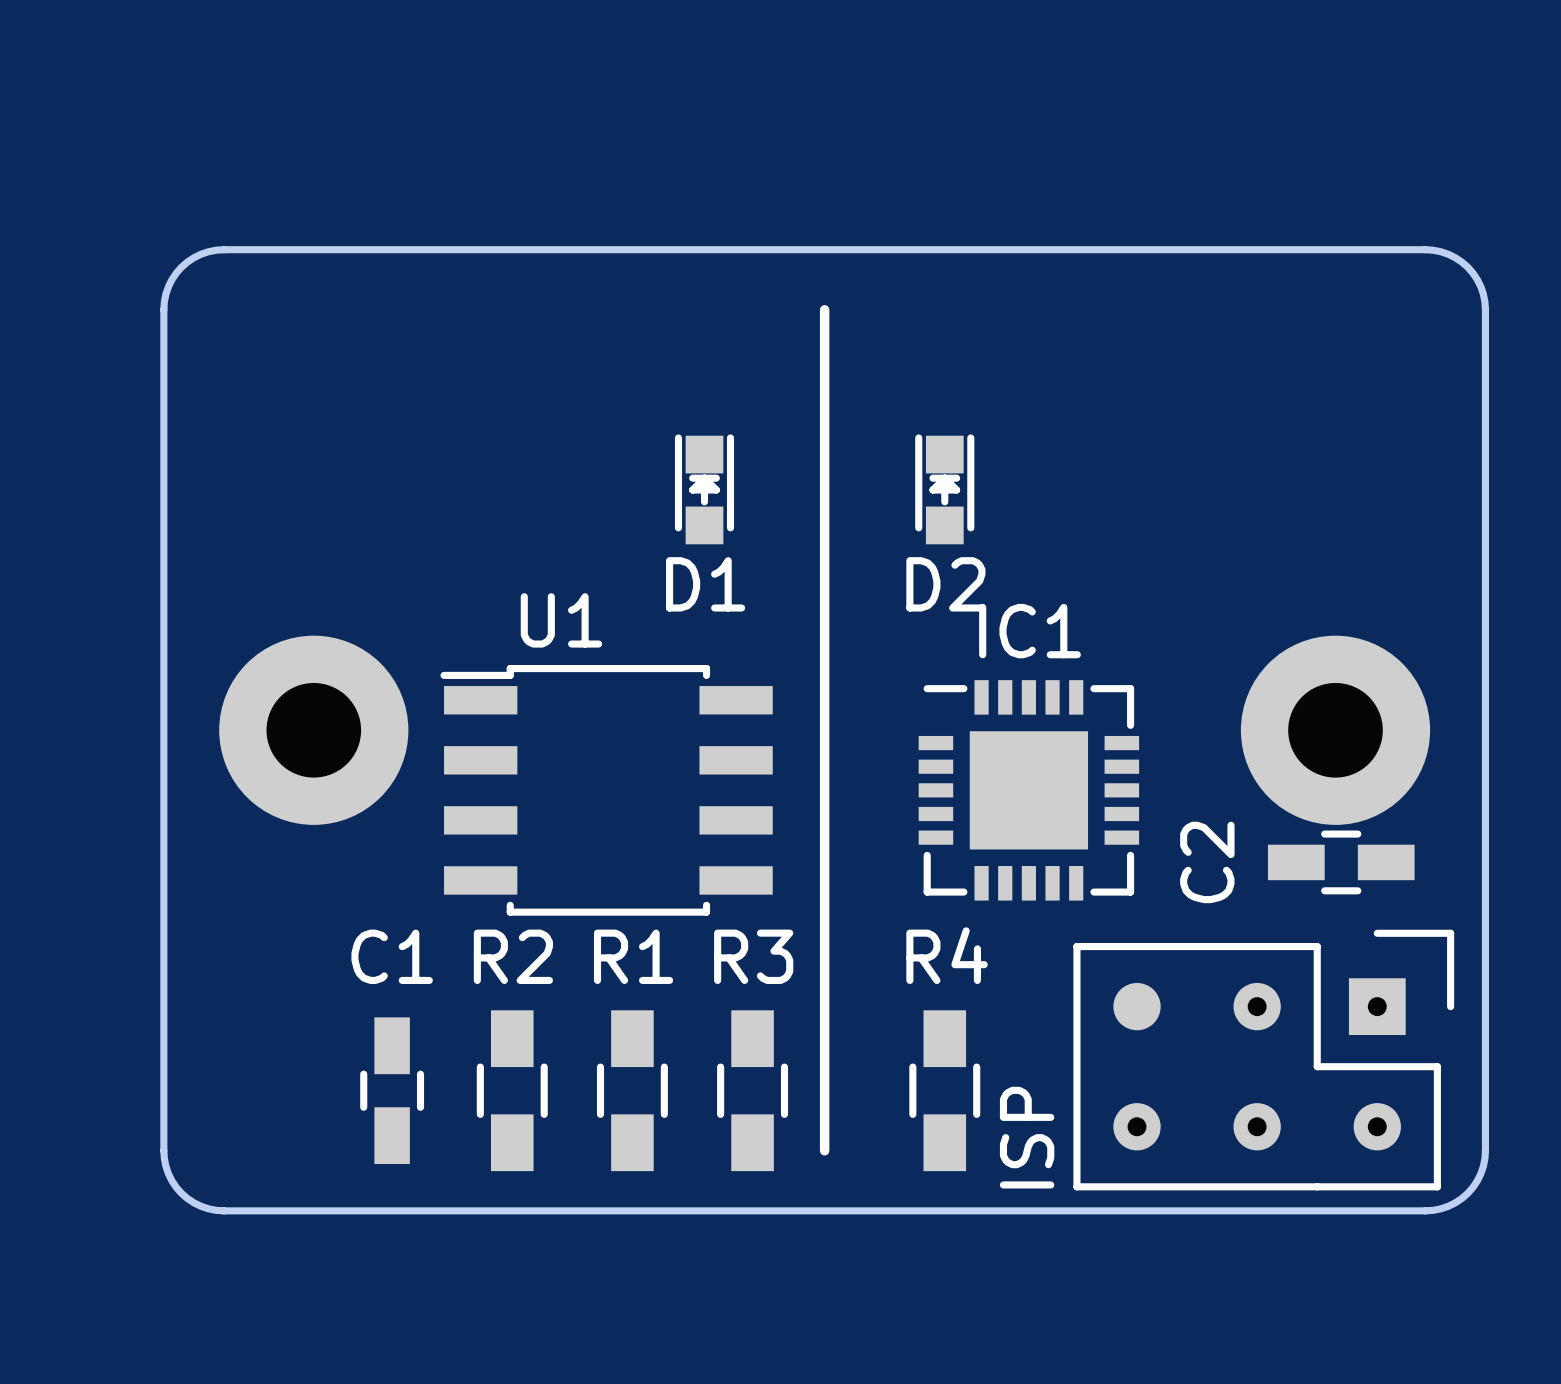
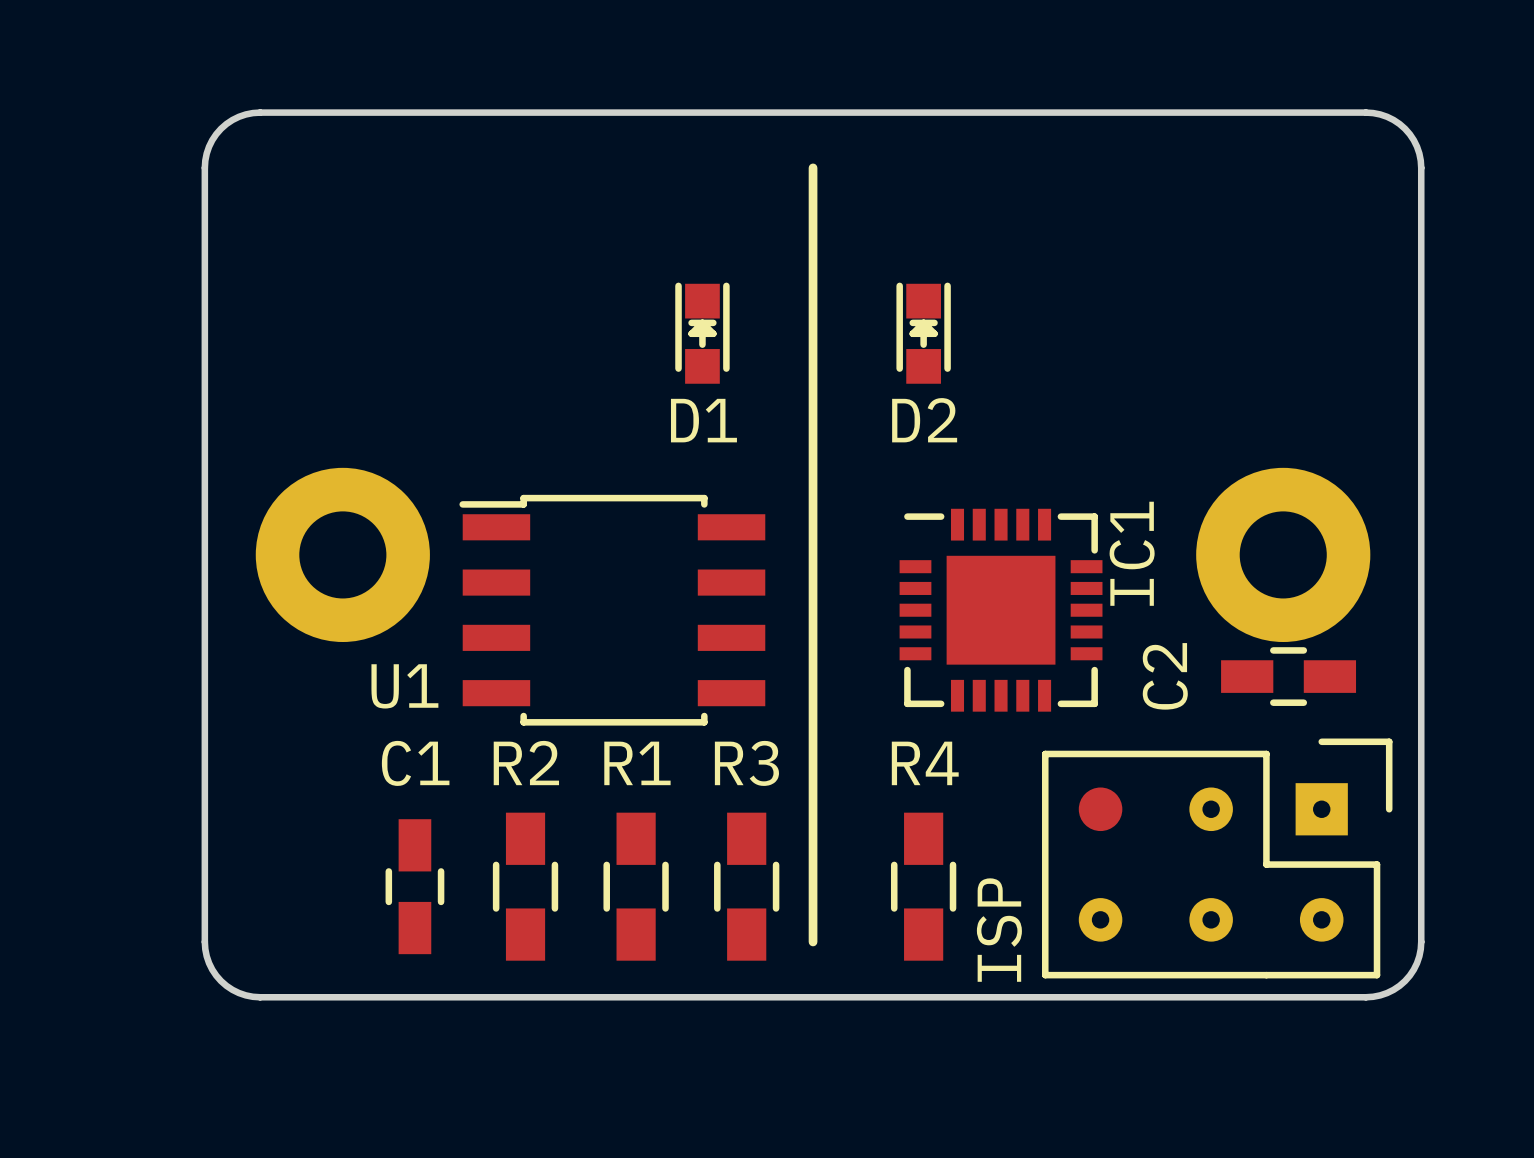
U1 name position: U1 (561, 620) -> U1 (404, 686)
IC1 name rotation: 0° (1030, 631) -> 90° counterclockwise (1132, 553)
IC1 name position: IC1 (1030, 631) -> IC1 (1132, 553)

